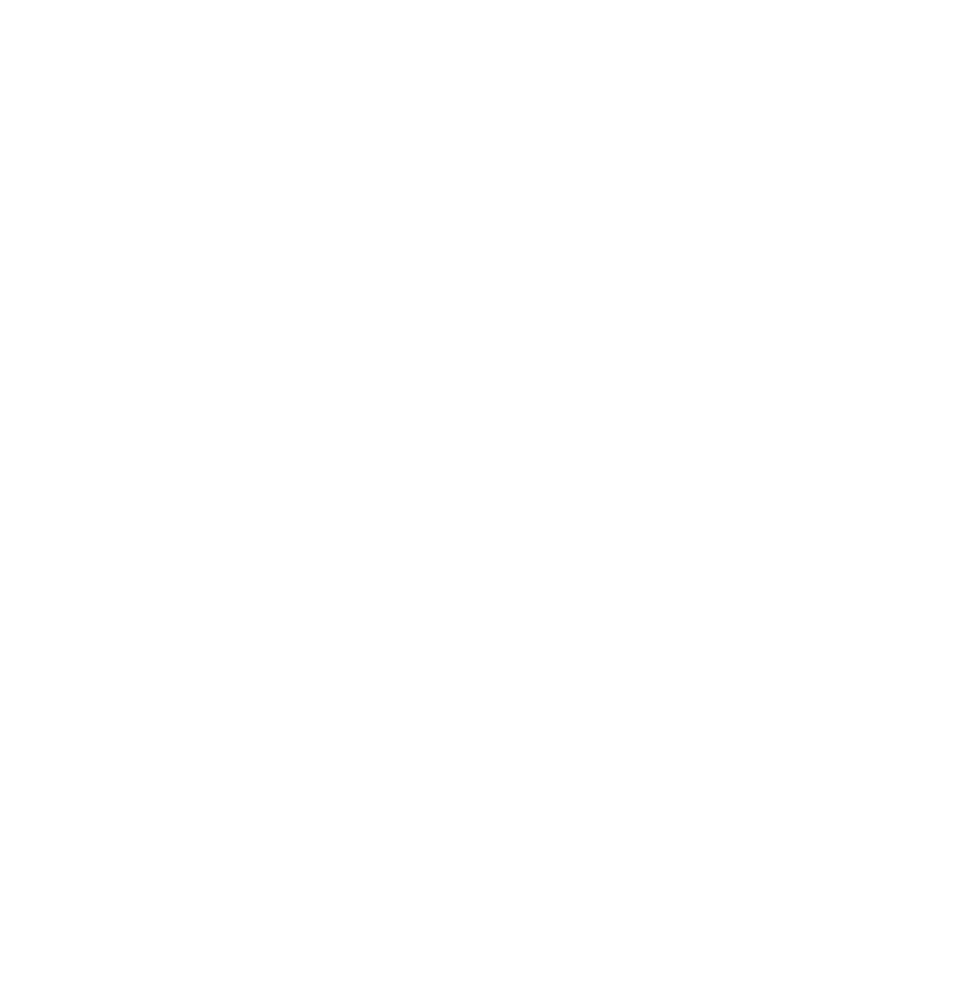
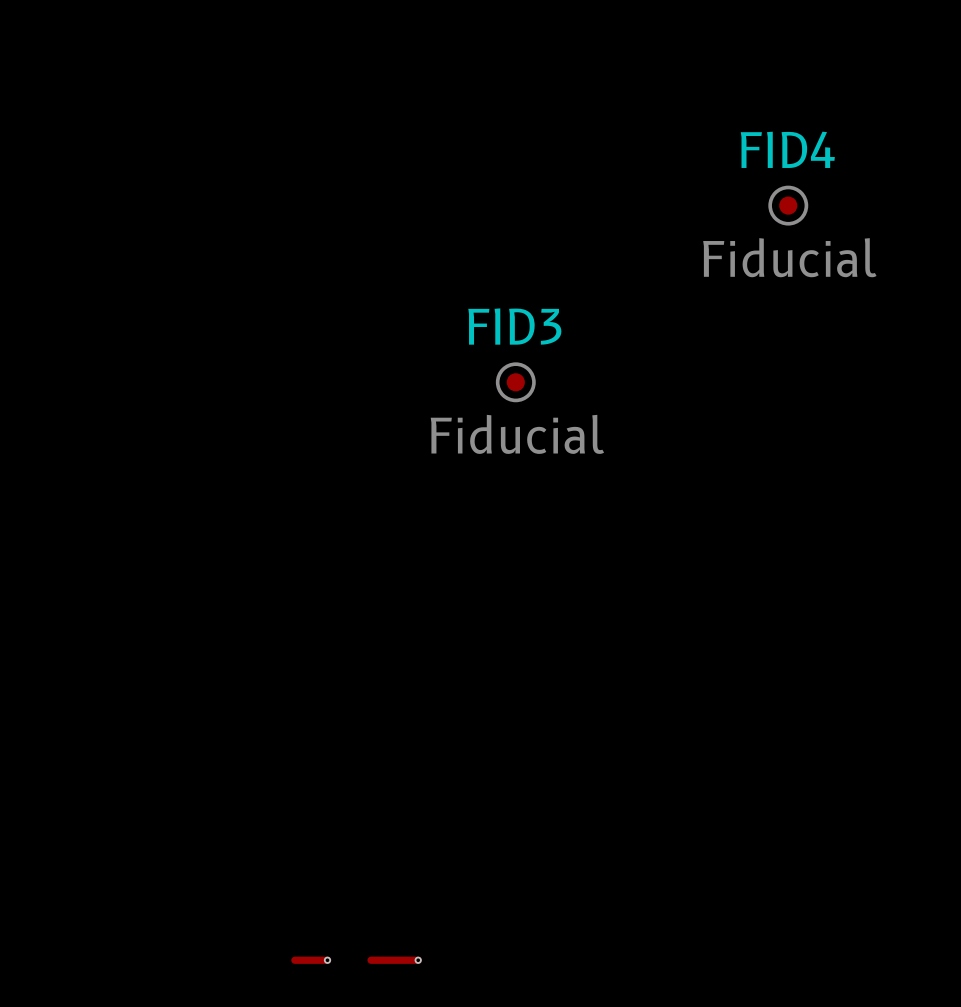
FID4: none -> Fiducial (788, 205)
FID3: none -> Fiducial (515, 382)
track: none -> (294, 960) (327, 960)
via: none -> (327, 960)
track: none -> (371, 960) (418, 960)
via: none -> (418, 960)

